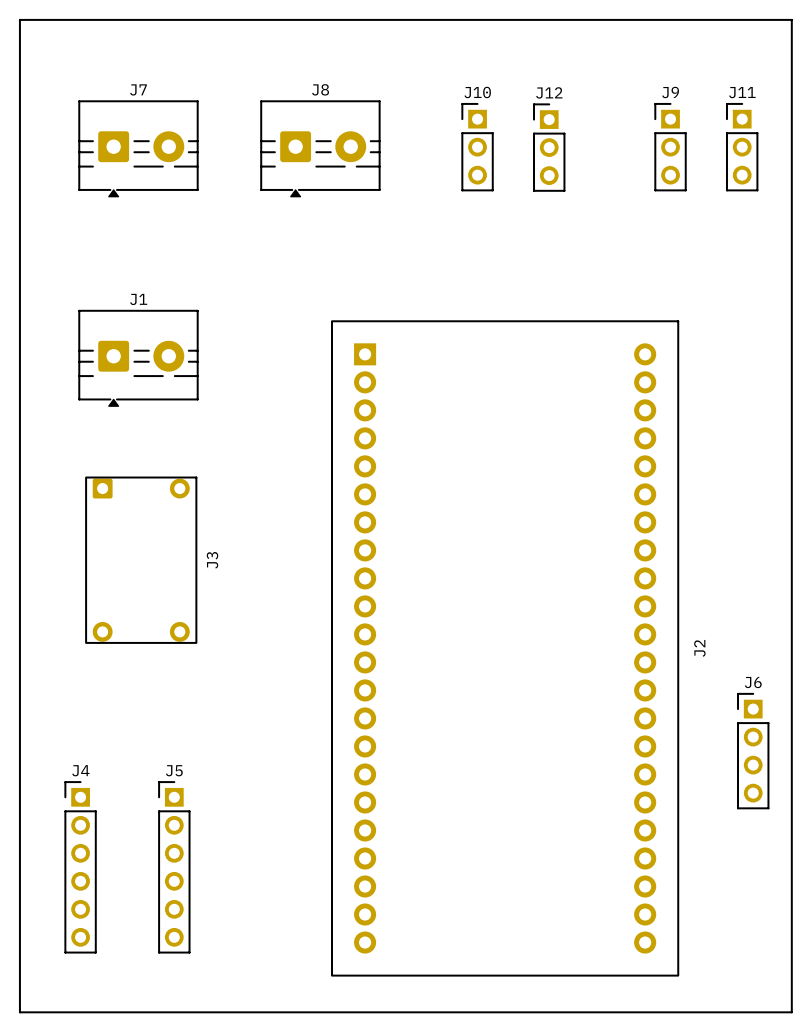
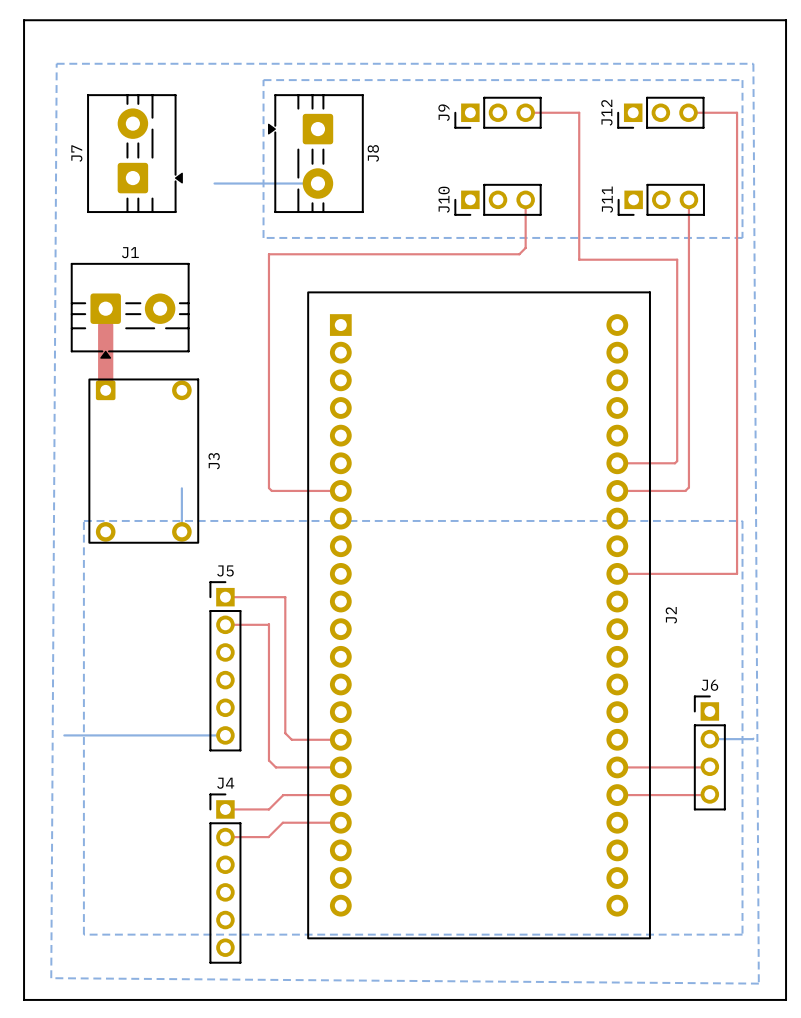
bottom zone outline: none -> (56, 63) (753, 63) (758, 983) (51, 978) (56, 63)
bottom zone outline: none -> (263, 80) (742, 80) (742, 237) (263, 237) (263, 80)
top track: none -> (525, 112) (579, 112) (579, 259) (677, 259) (677, 461) (675, 463) (617, 463)
top track: none -> (688, 112) (737, 112) (737, 573) (617, 573)
J10 rotation: 0° (477, 147) -> 90° counterclockwise (498, 199)
J10 position: (477, 147) -> (498, 199)
J12 rotation: 0° (549, 147) -> 90° counterclockwise (660, 112)
J12 position: (549, 147) -> (660, 112)
J9 rotation: 0° (670, 147) -> 90° counterclockwise (498, 112)
J9 position: (670, 147) -> (498, 112)
J11 rotation: 0° (742, 147) -> 90° counterclockwise (661, 199)
J11 position: (742, 147) -> (661, 199)
J7 rotation: 0° (138, 148) -> 90° counterclockwise (135, 153)
J8 rotation: 0° (320, 148) -> 90° clockwise (315, 153)
bottom track: none -> (214, 183) (317, 183)
top track: none -> (525, 199) (525, 247) (519, 254) (268, 254) (268, 488) (271, 490) (340, 490)
top track: none -> (688, 199) (688, 487) (685, 490) (617, 490)
top track: none -> (116, 308) (116, 314) (105, 325) (105, 390)
J1 position: (138, 358) -> (130, 310)
bottom track: none -> (181, 488) (181, 531)
bottom zone outline: none -> (83, 520) (742, 520) (742, 934) (83, 934) (83, 520)
J3 position: (141, 560) -> (143, 461)
top track: none -> (225, 597) (285, 597) (285, 733) (291, 739) (340, 739)
top track: none -> (225, 624) (268, 624) (268, 760) (275, 767) (340, 767)
J2 position: (505, 648) -> (479, 615)
bottom track: none -> (64, 735) (225, 735)
bottom track: none -> (753, 738) (709, 739)
J6 position: (753, 751) -> (709, 752)
top track: none -> (709, 766) (617, 767)
top track: none -> (340, 795) (283, 795) (268, 809) (225, 809)
top track: none -> (709, 794) (617, 795)
top track: none -> (340, 822) (282, 822) (268, 837) (225, 837)
J4 position: (80, 867) -> (225, 878)
J5 position: (174, 867) -> (225, 666)

